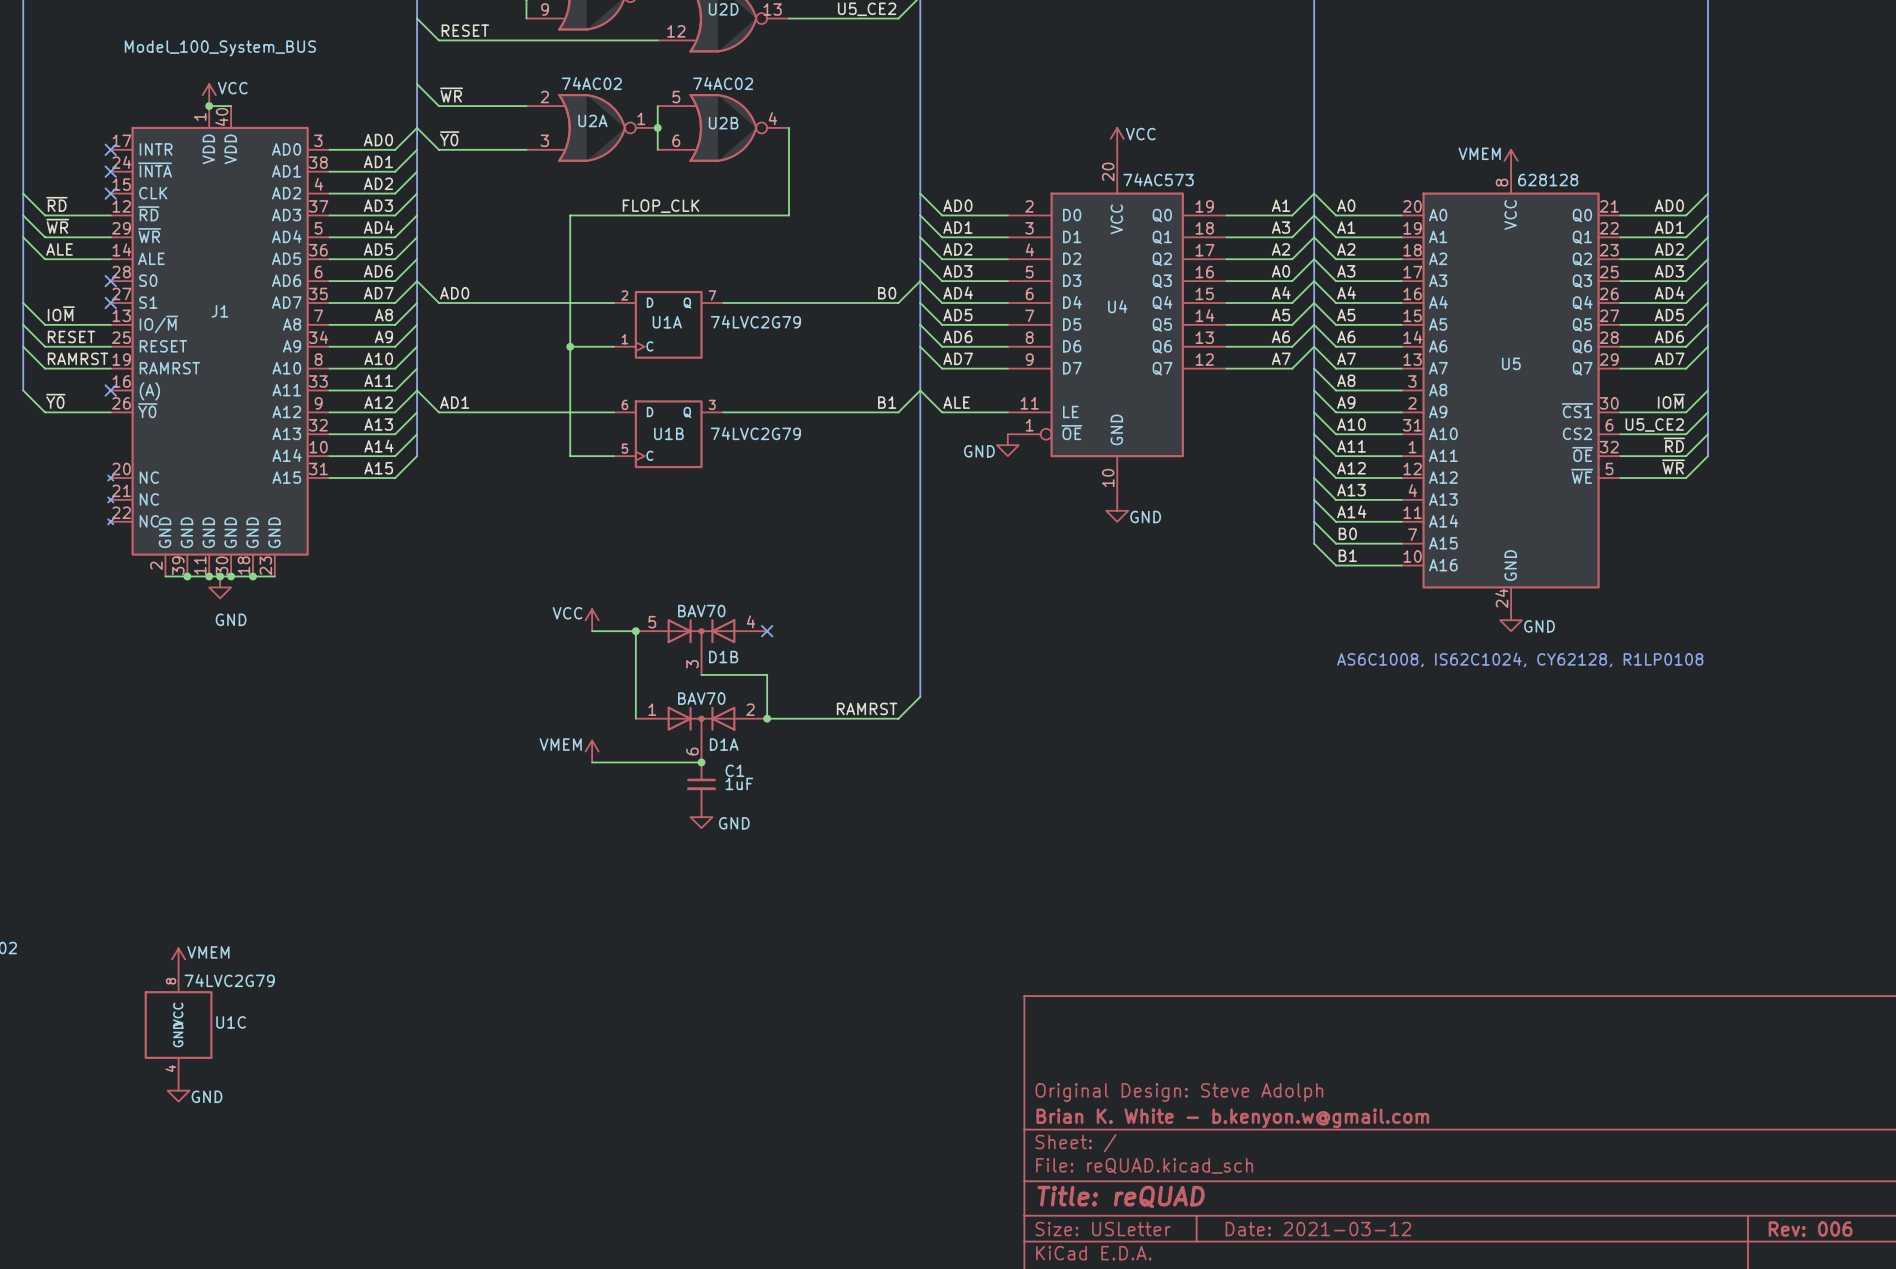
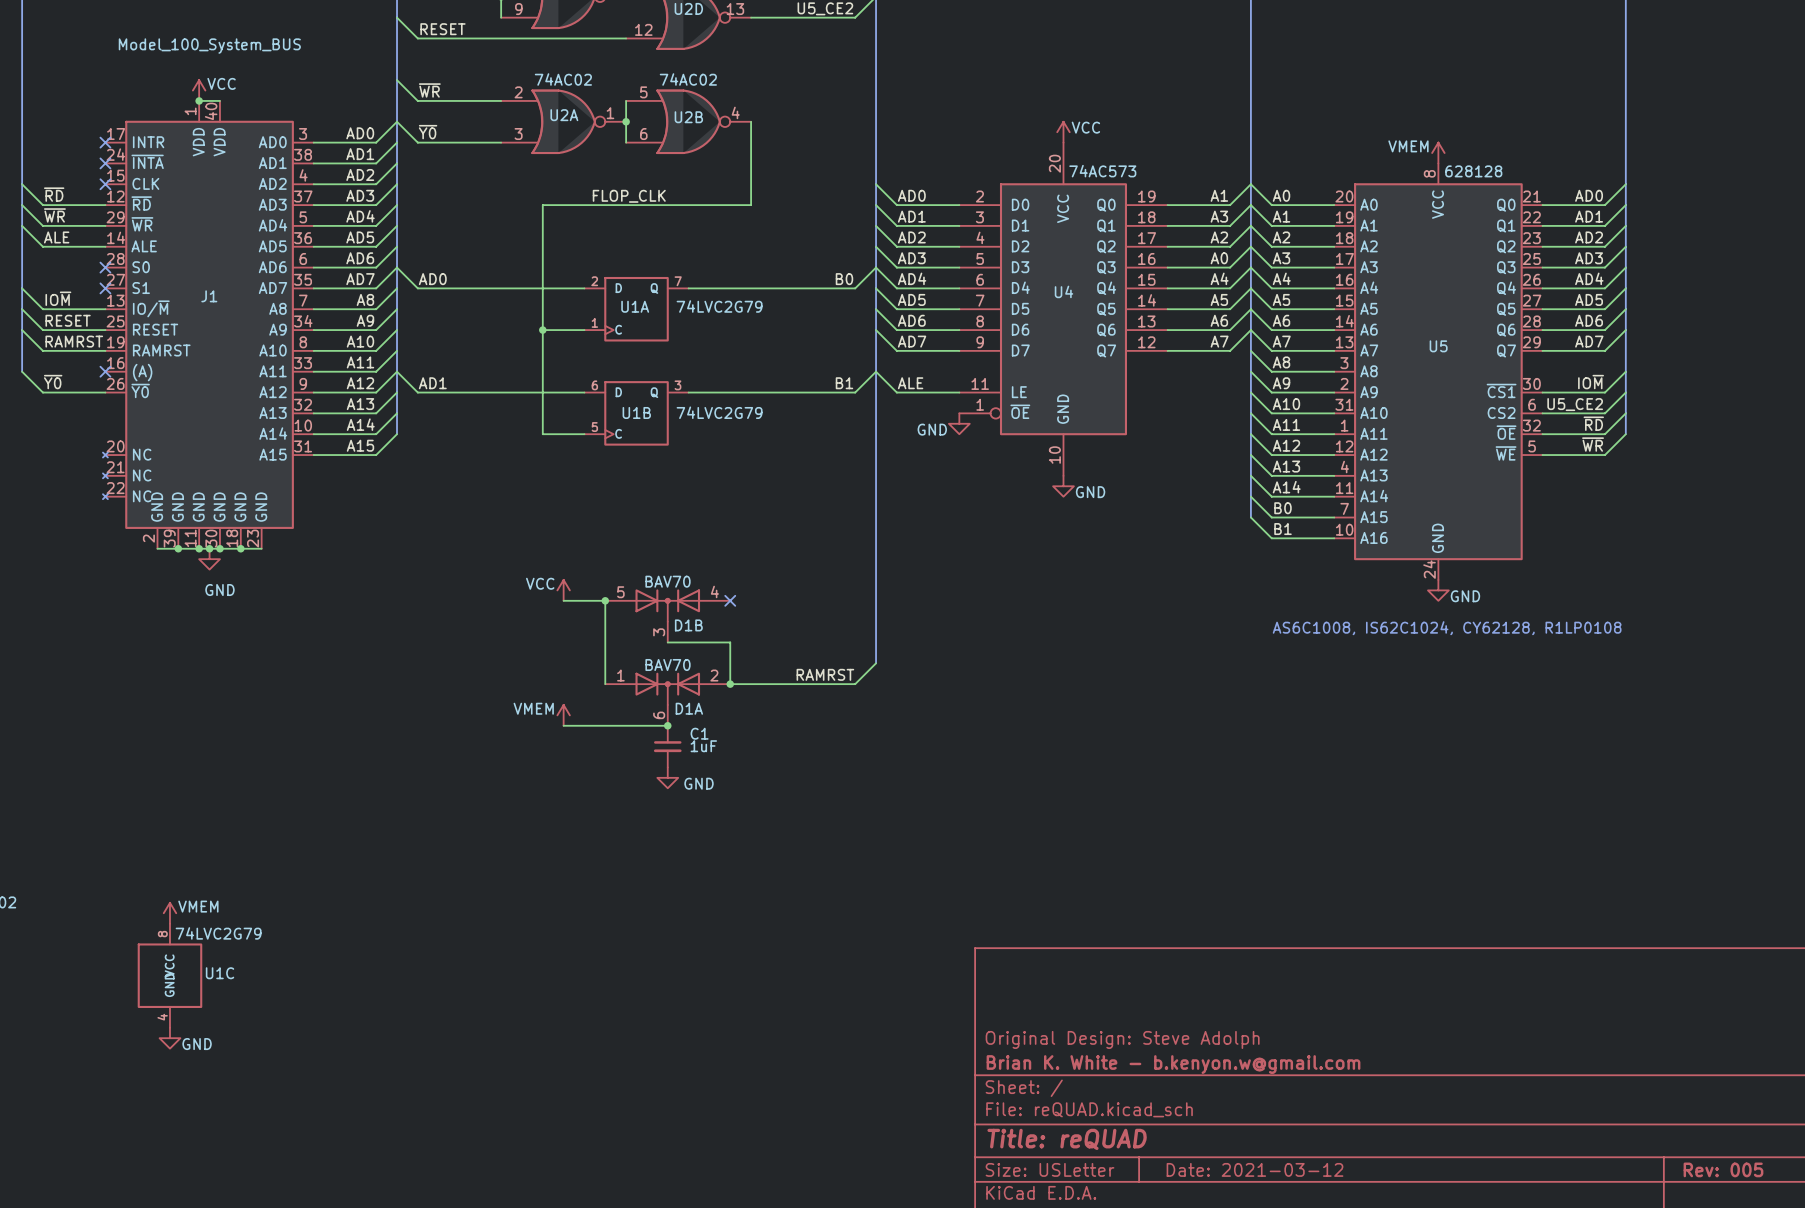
title block: Rev: 006 (1810, 1229) -> Rev: 005 (1723, 1169)

